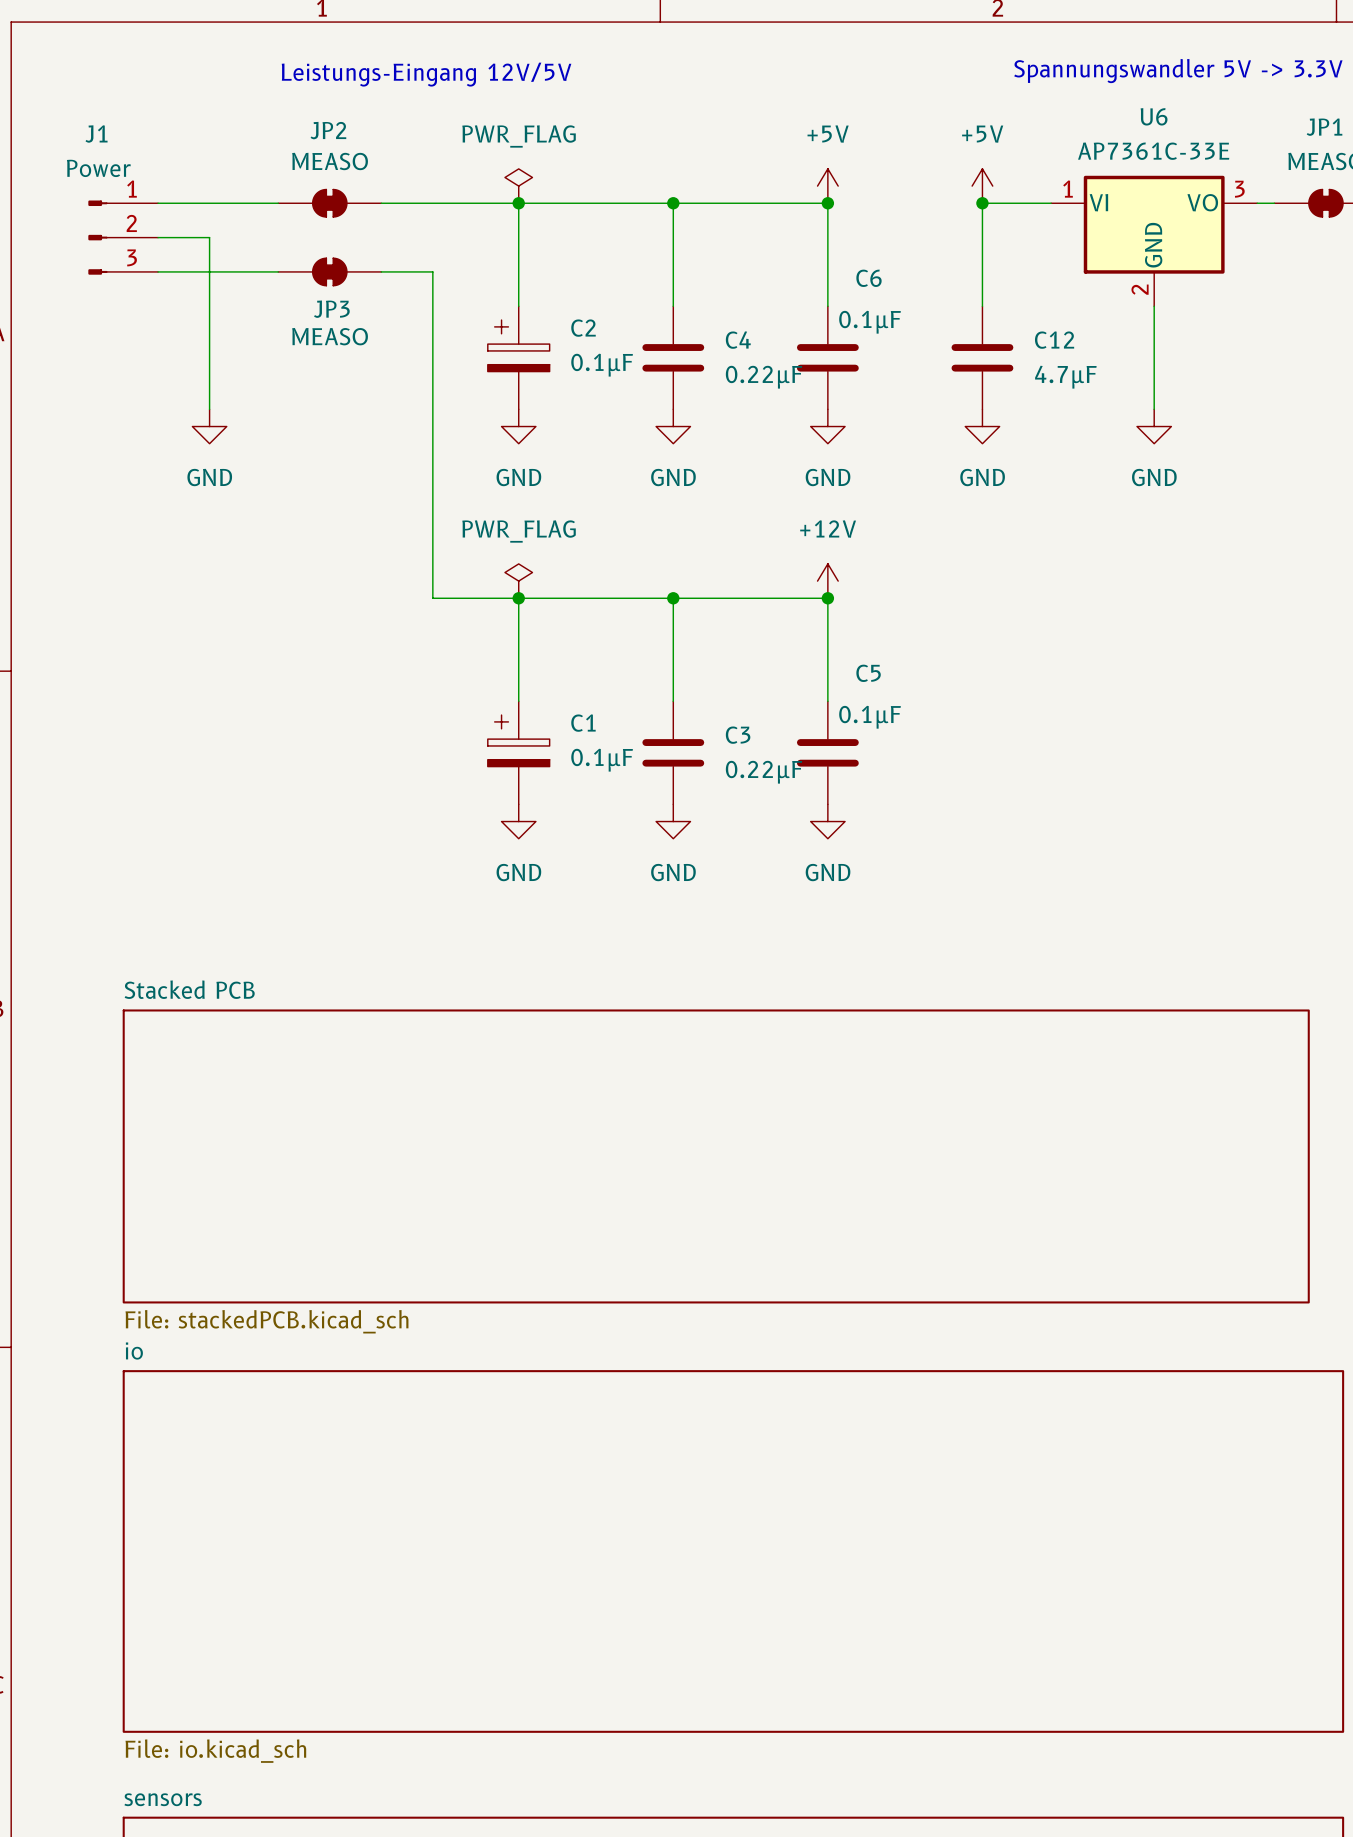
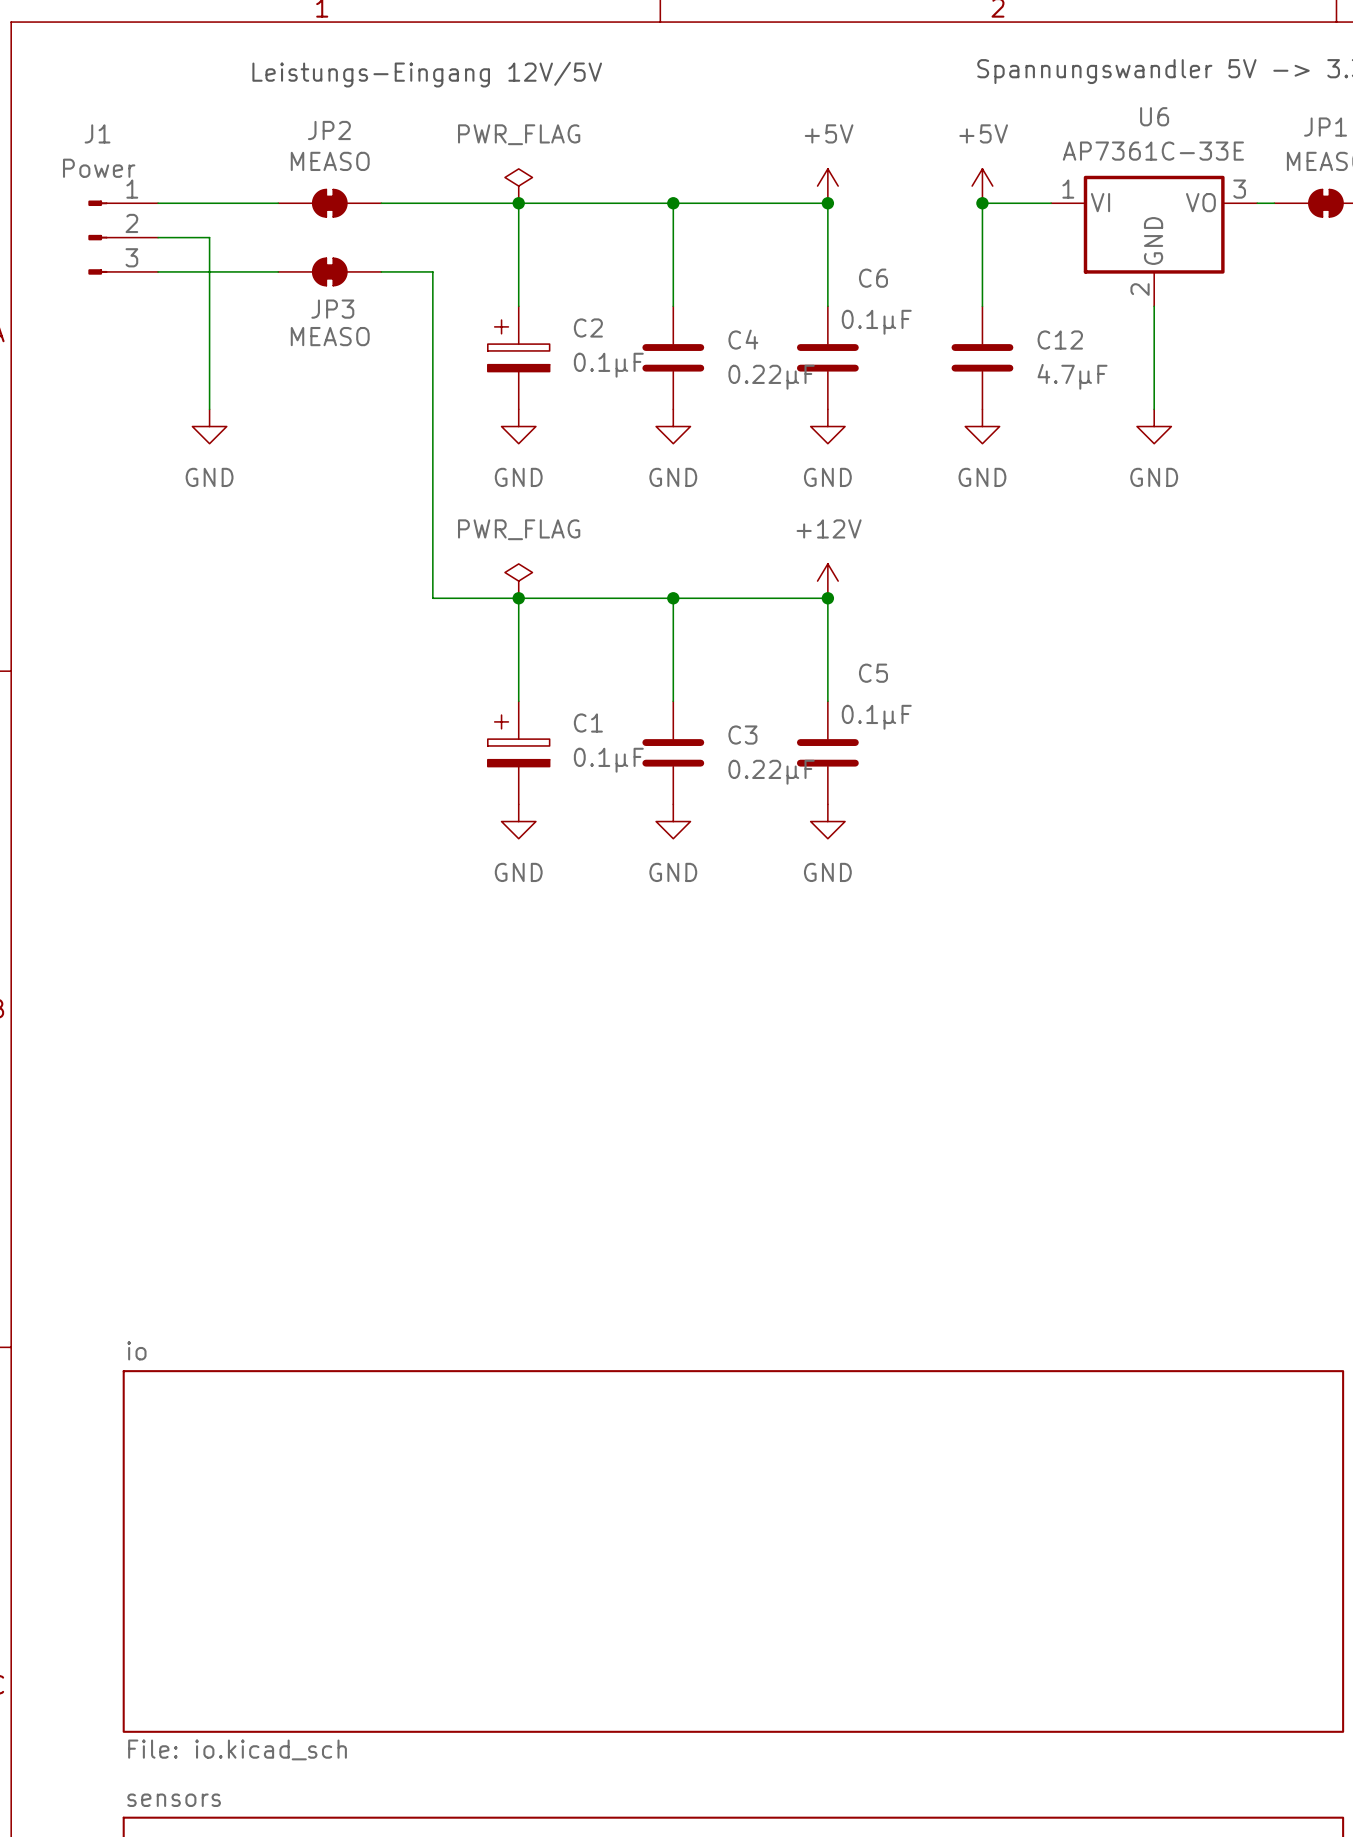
sheet Stacked PCB: File: stackedPCB.kicad_sch (716, 1156) -> none

